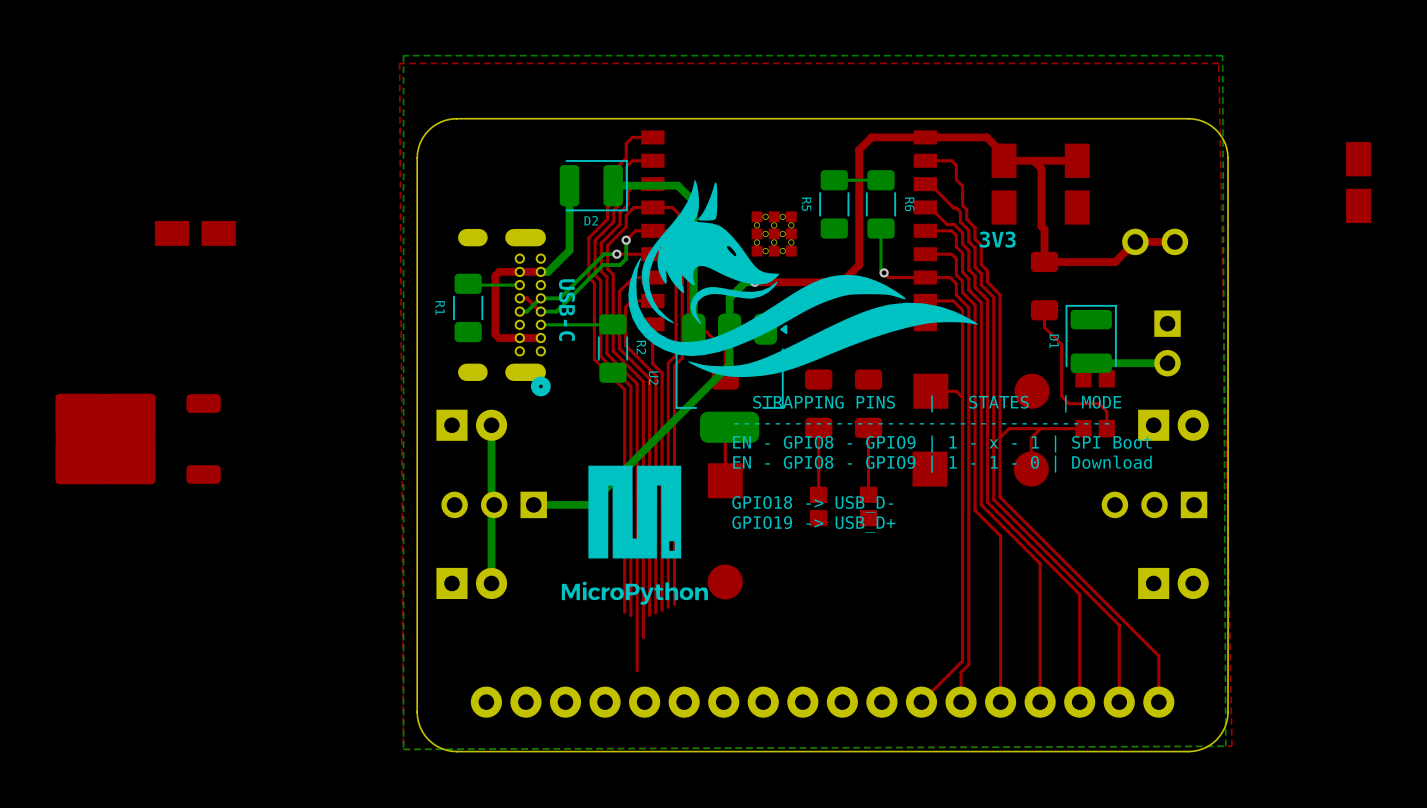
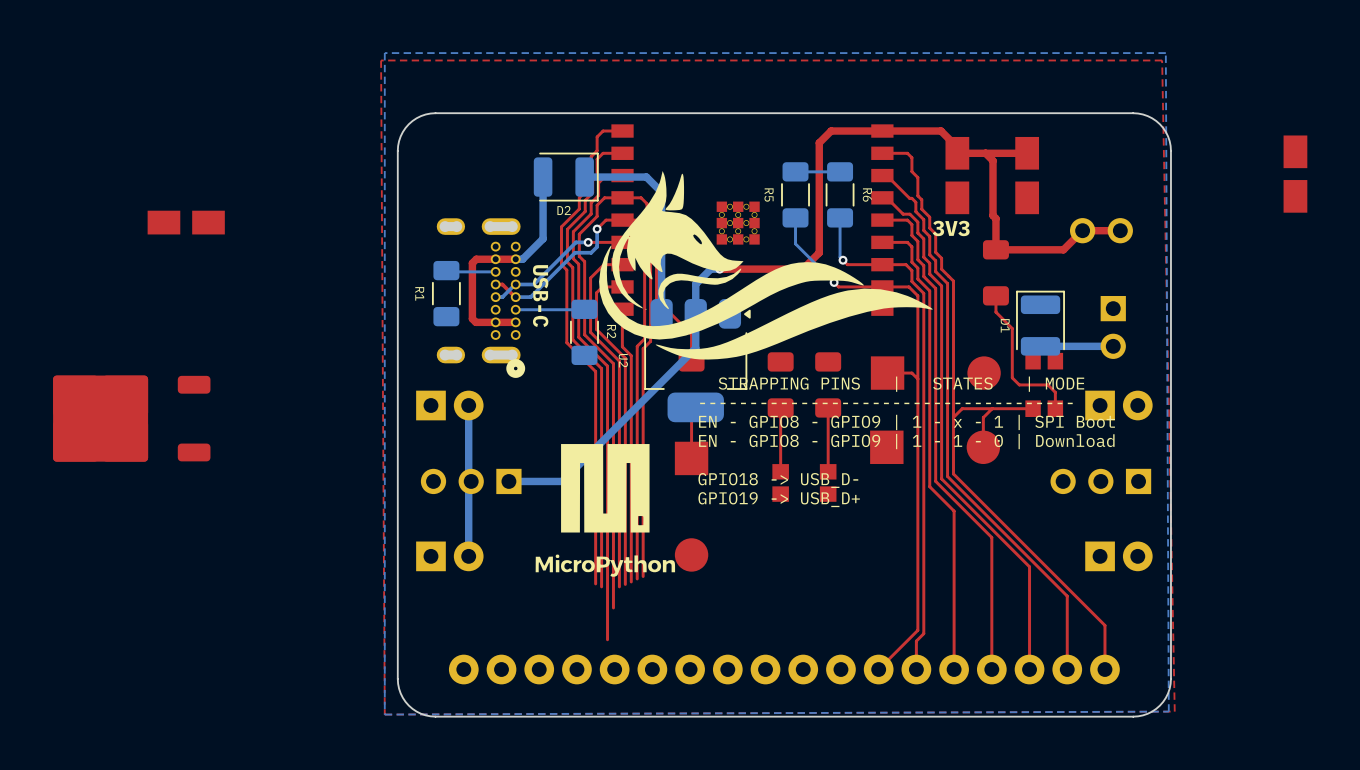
bottom track: none -> (795, 217) (795, 243) (834, 282)
top track: none -> (834, 282) (838, 286) (882, 286)
via: none -> (834, 282)

